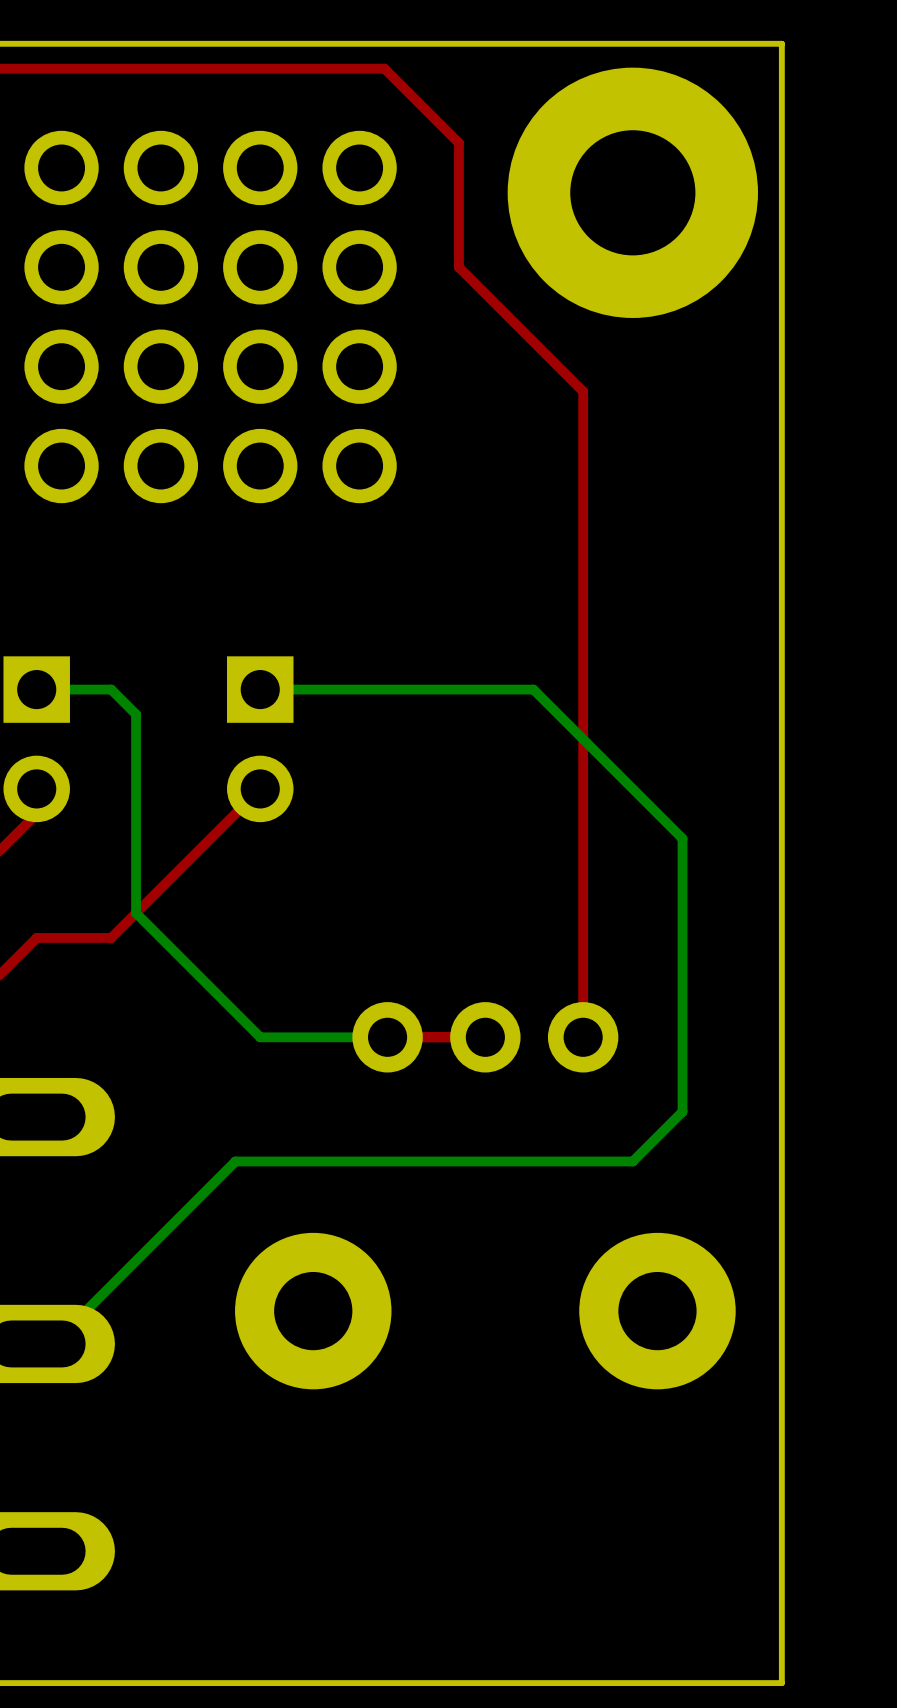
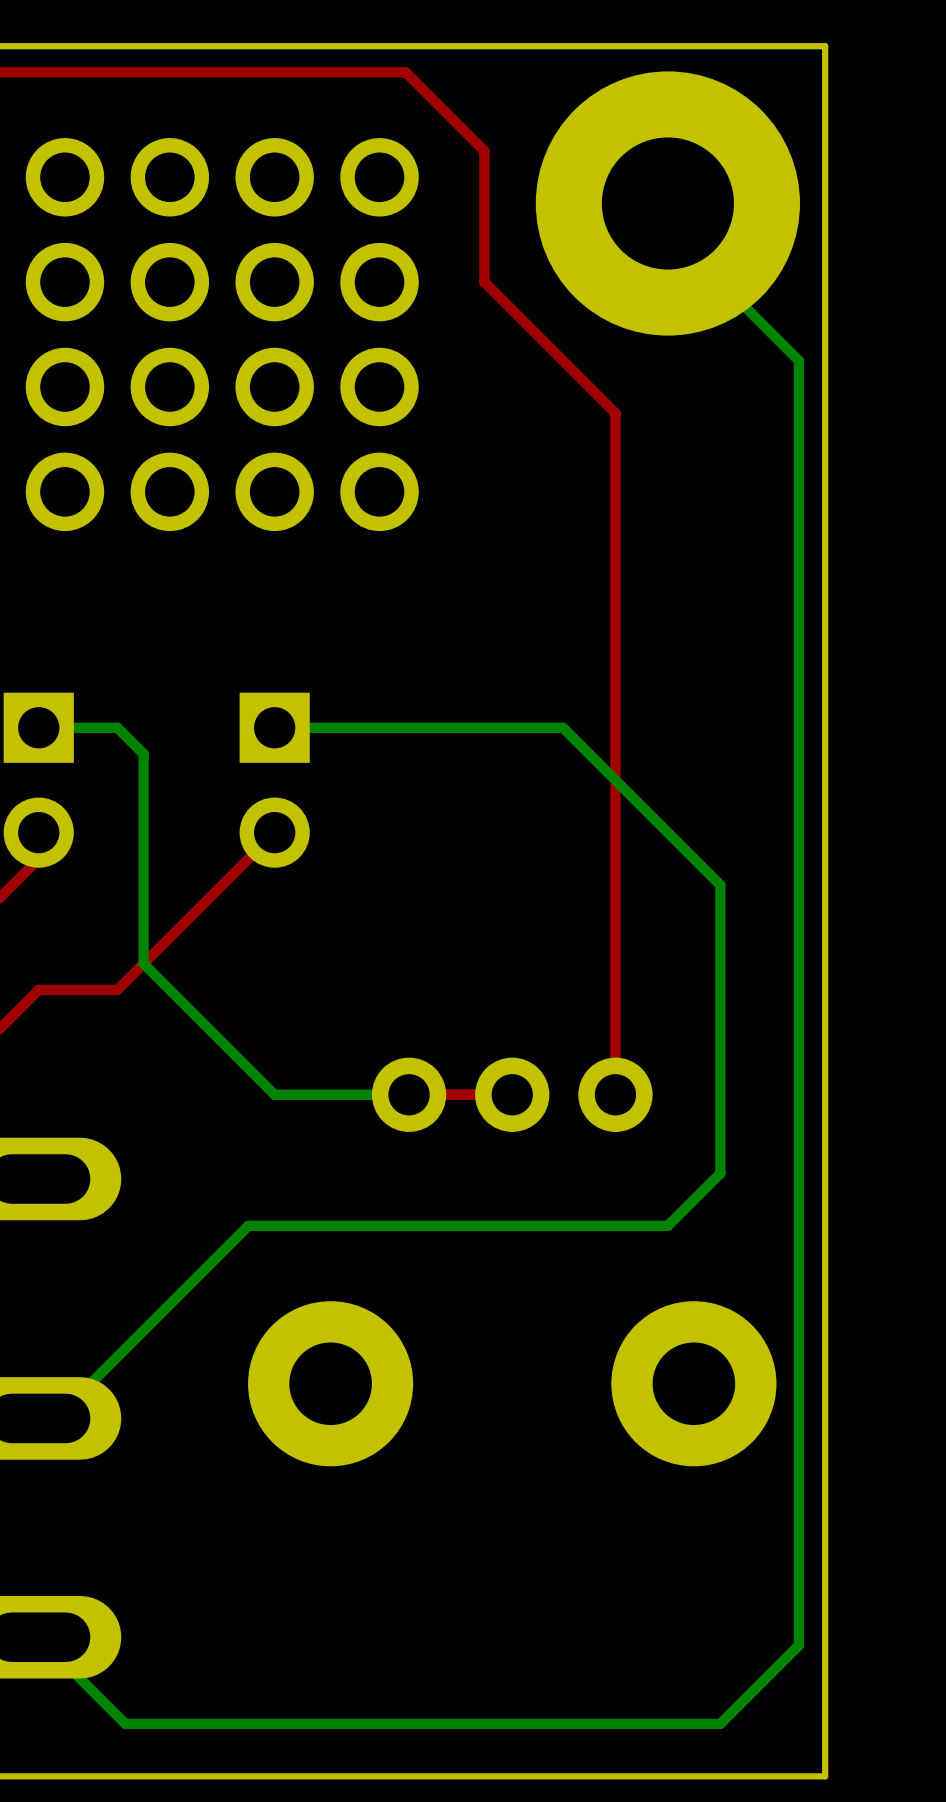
bottom track: none -> (667, 203) (667, 229) (798, 360) (798, 1645) (720, 1723) (125, 1723) (38, 1637)

